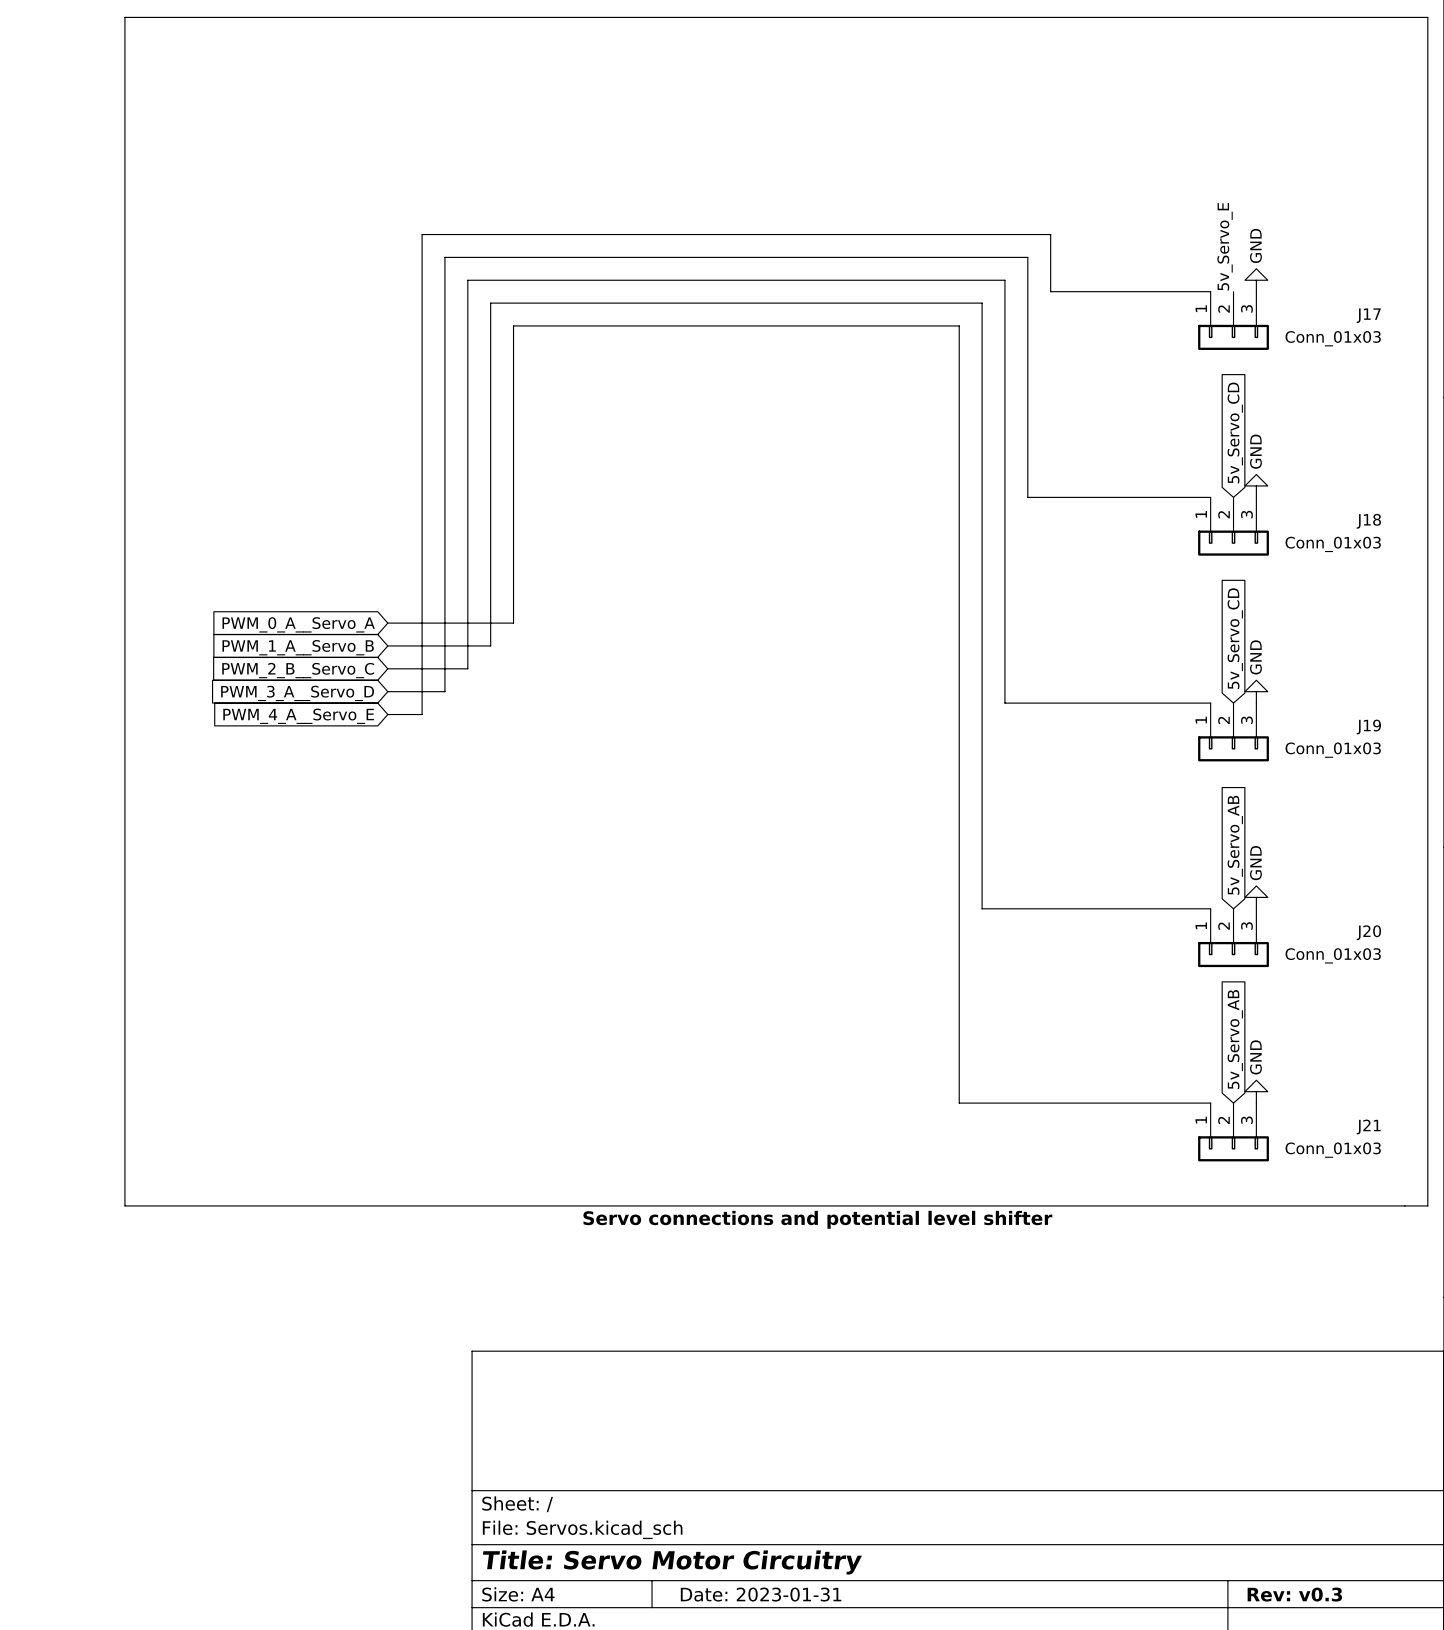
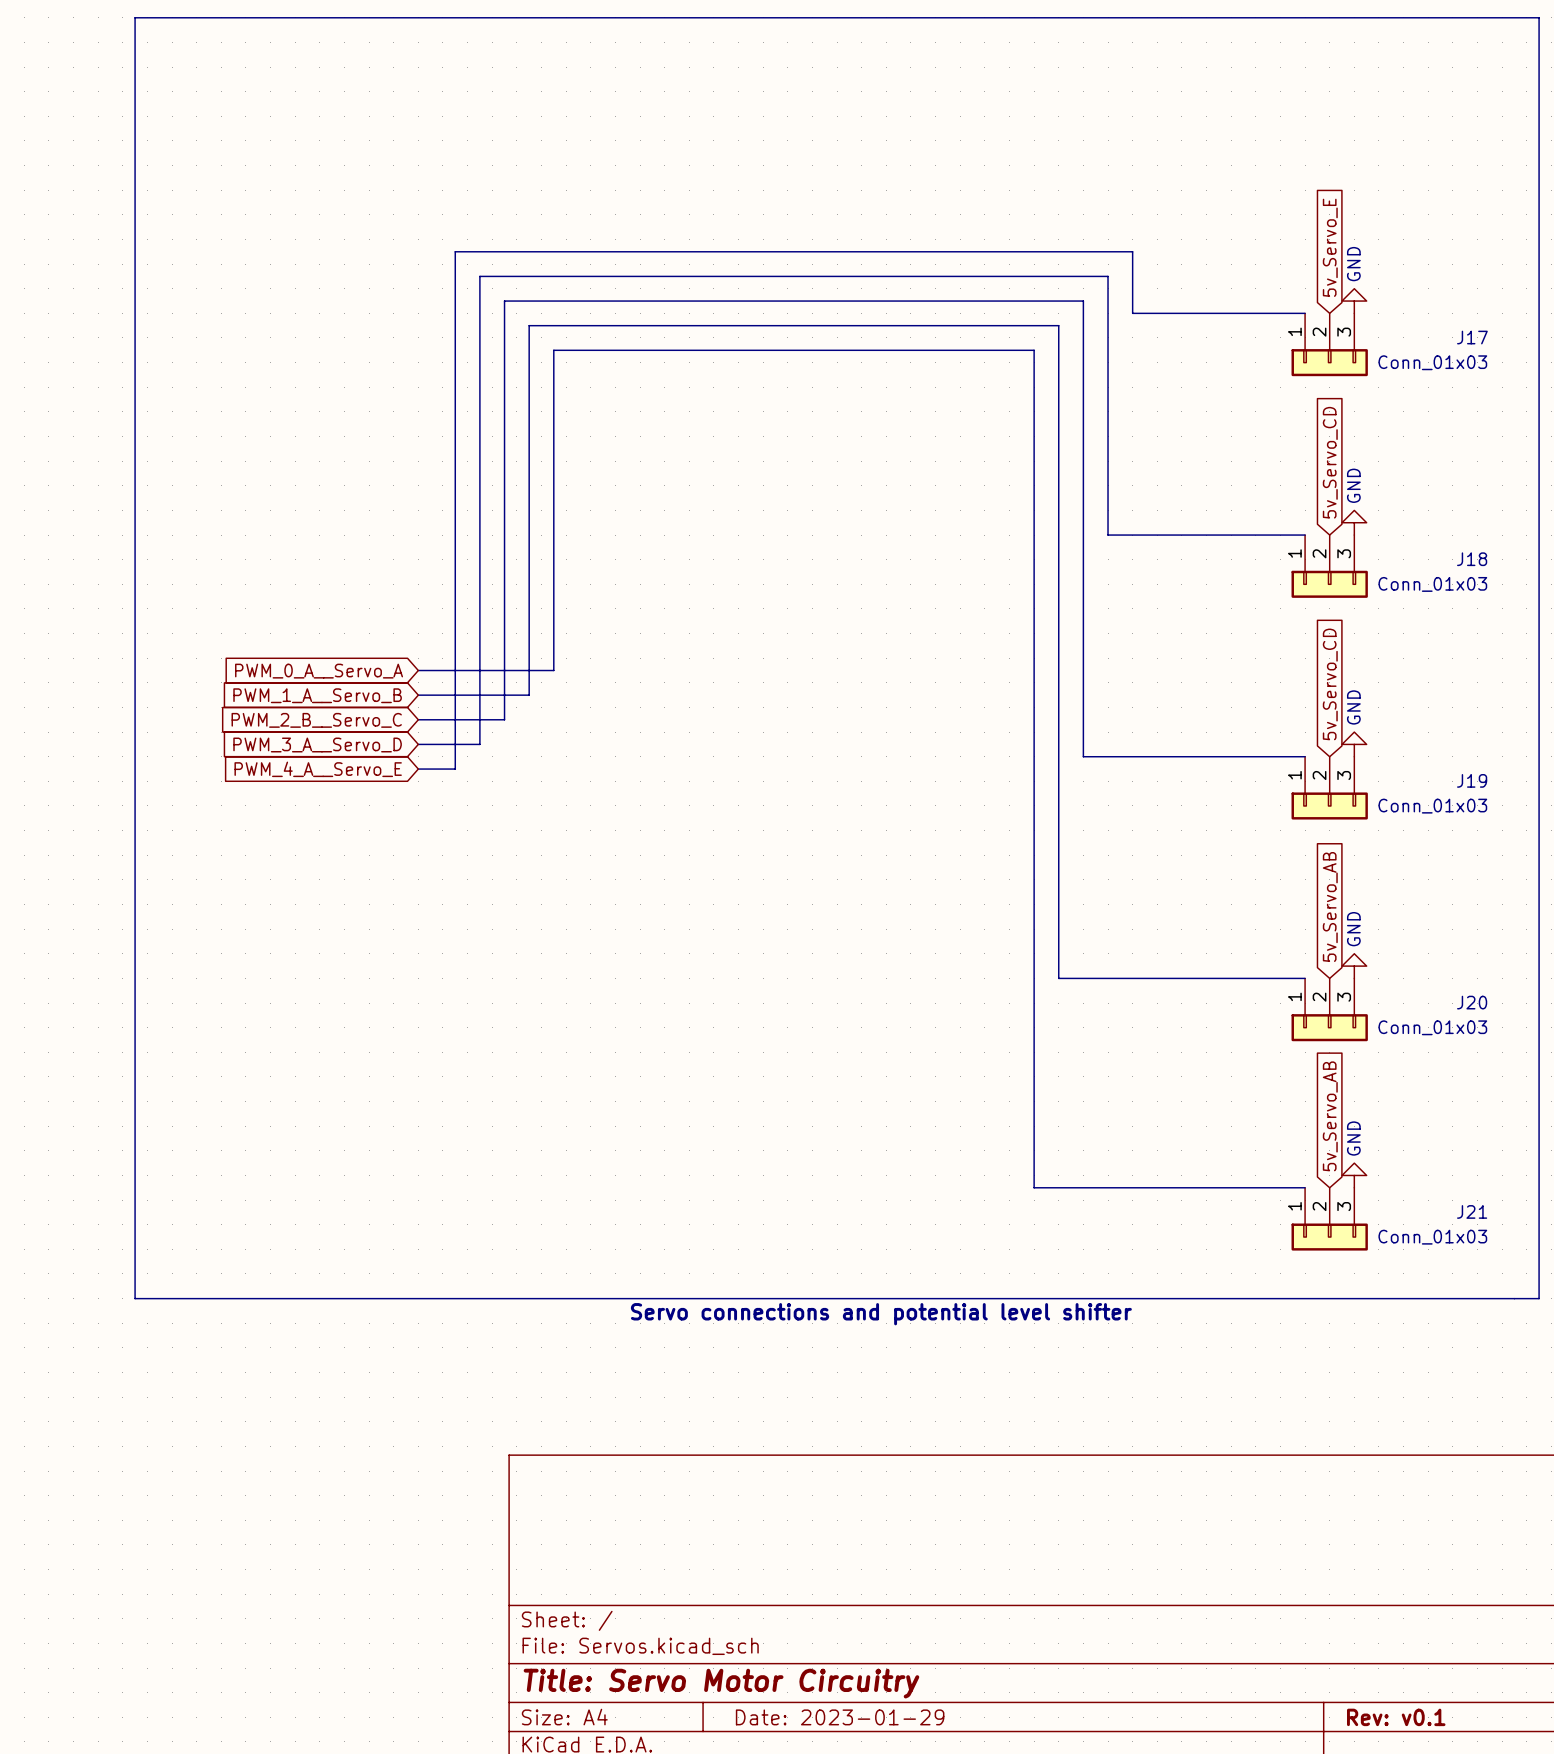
global label: none -> 5v_Servo_E (1330, 247)
label: 5v_Servo_E (1225, 246) -> none
title block: Date: 2023-01-31 (761, 1594) -> Date: 2023-01-29 (840, 1717)
title block: Rev: v0.3 (1294, 1594) -> Rev: v0.1 (1396, 1717)

